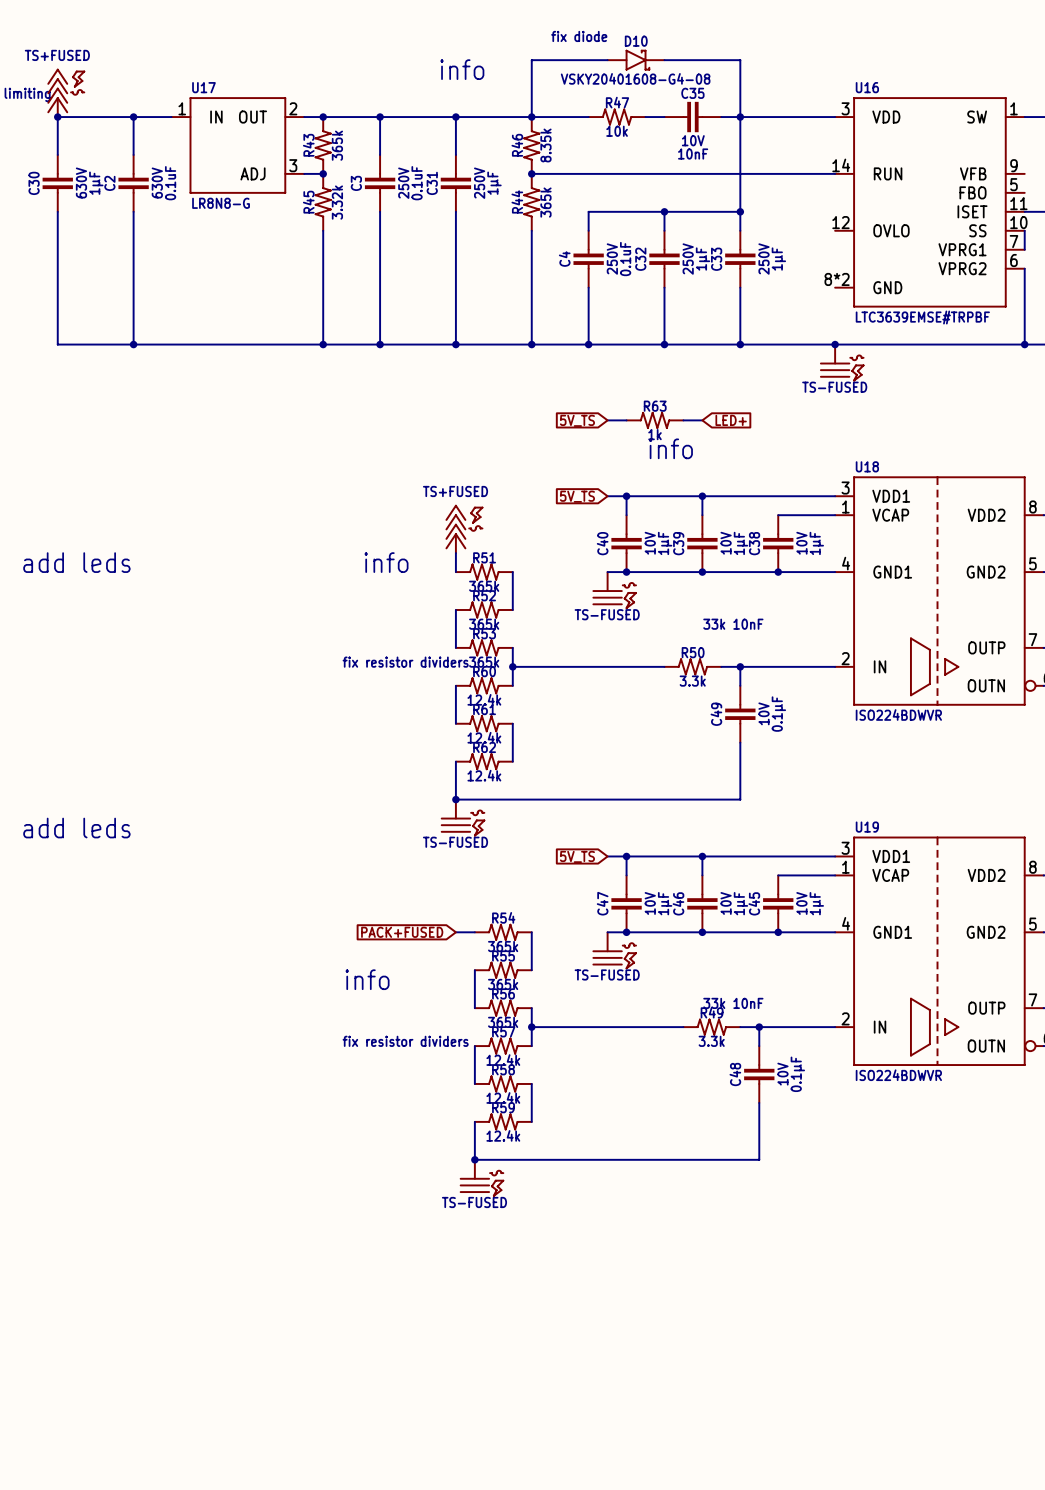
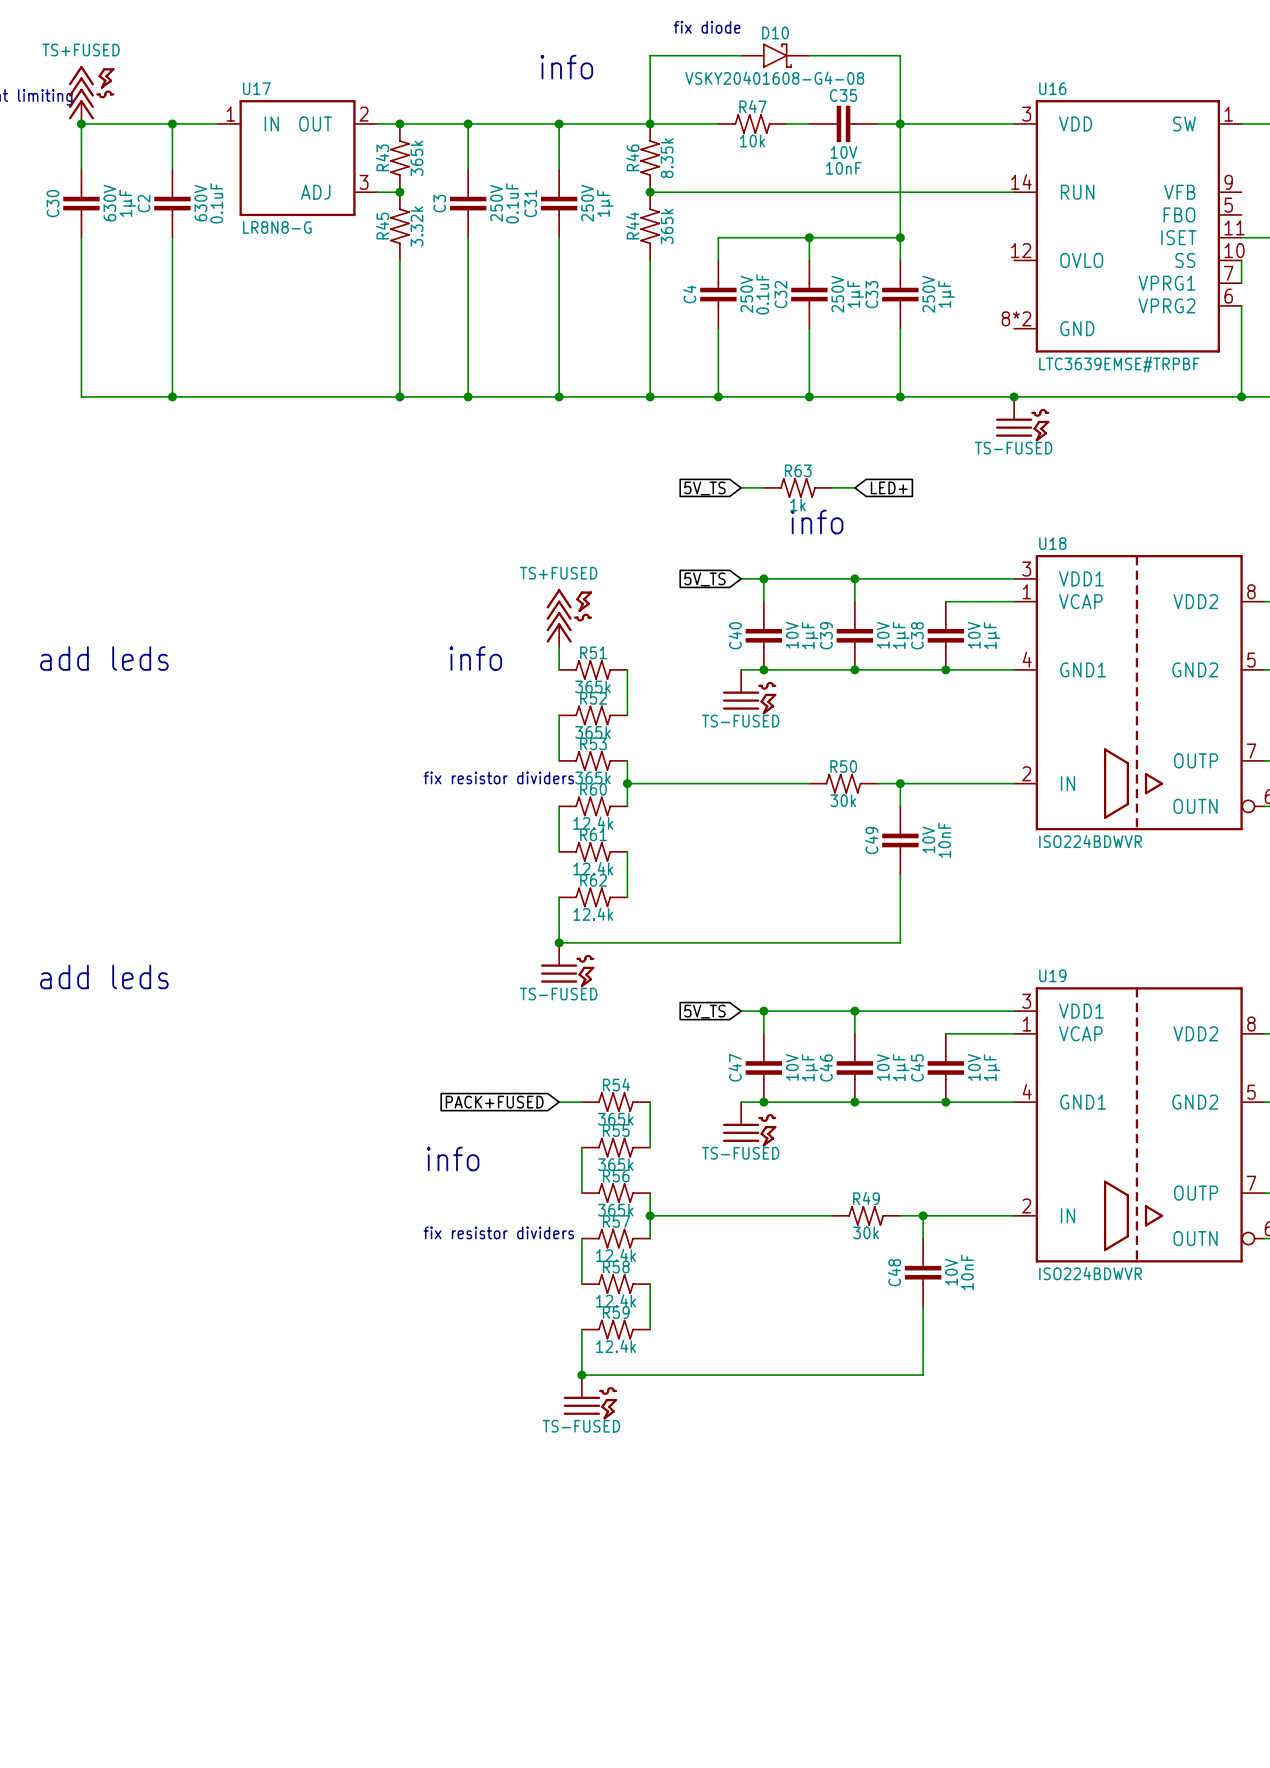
text: 33k 10nF (733, 624) -> none
R50 text: 3.3k (692, 681) -> 30k (843, 800)
C49 text: 0.1µF (778, 714) -> 10nF (944, 840)
text: 33k 10nF (733, 1003) -> none
R49 text: 3.3k (711, 1041) -> 30k (866, 1232)
C48 text: 0.1µF (797, 1074) -> 10nF (967, 1272)

